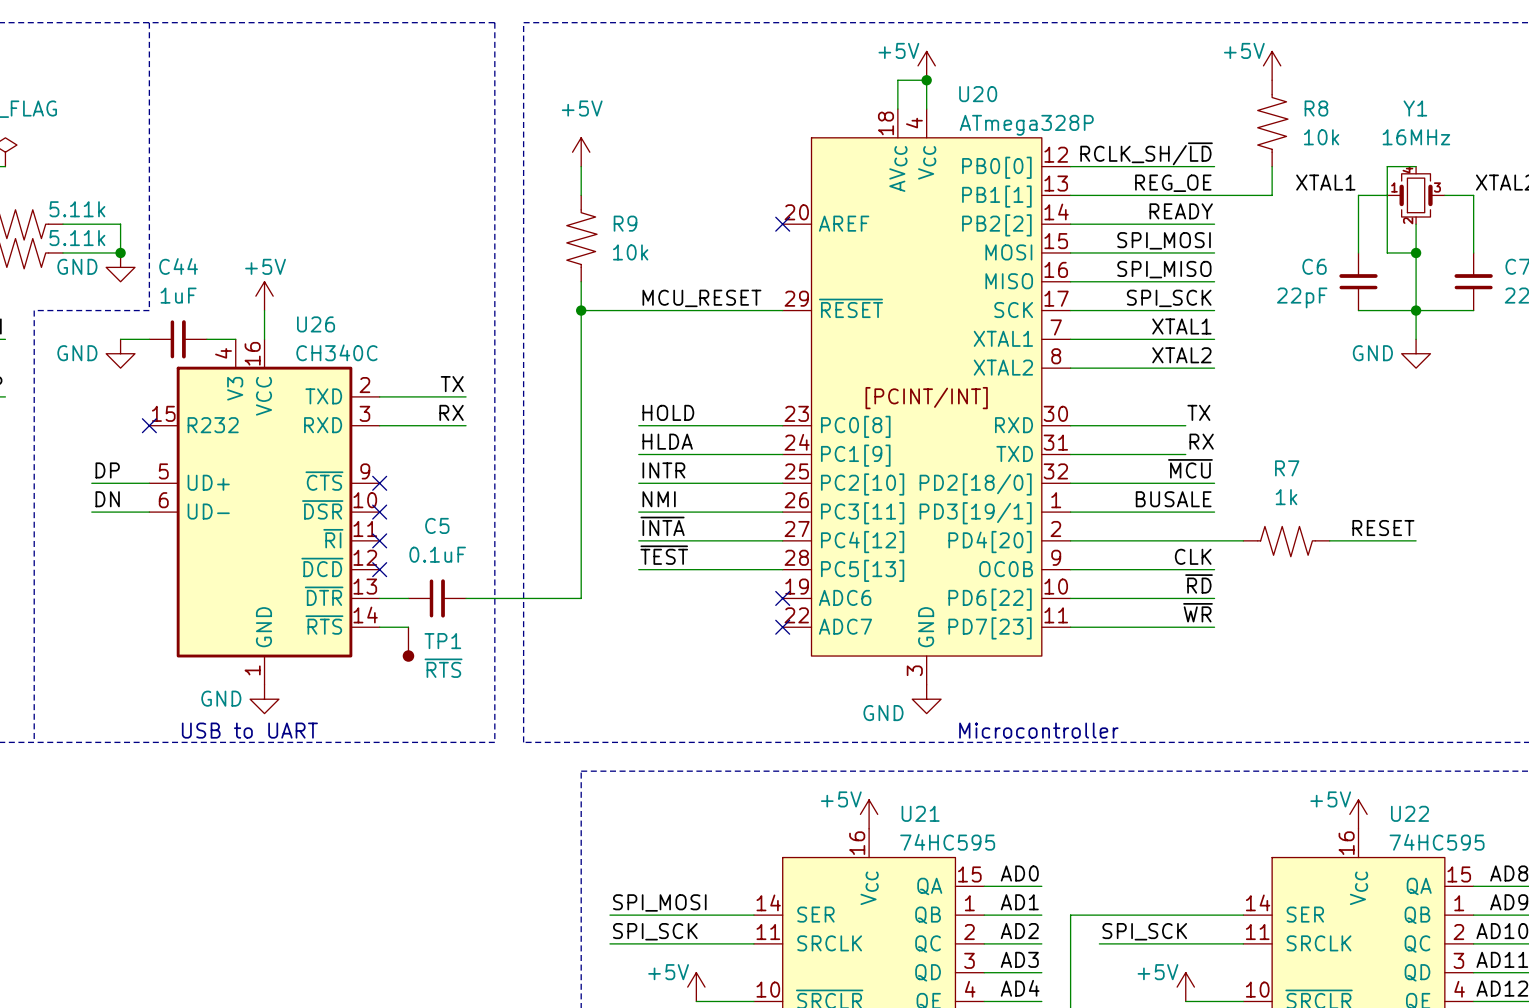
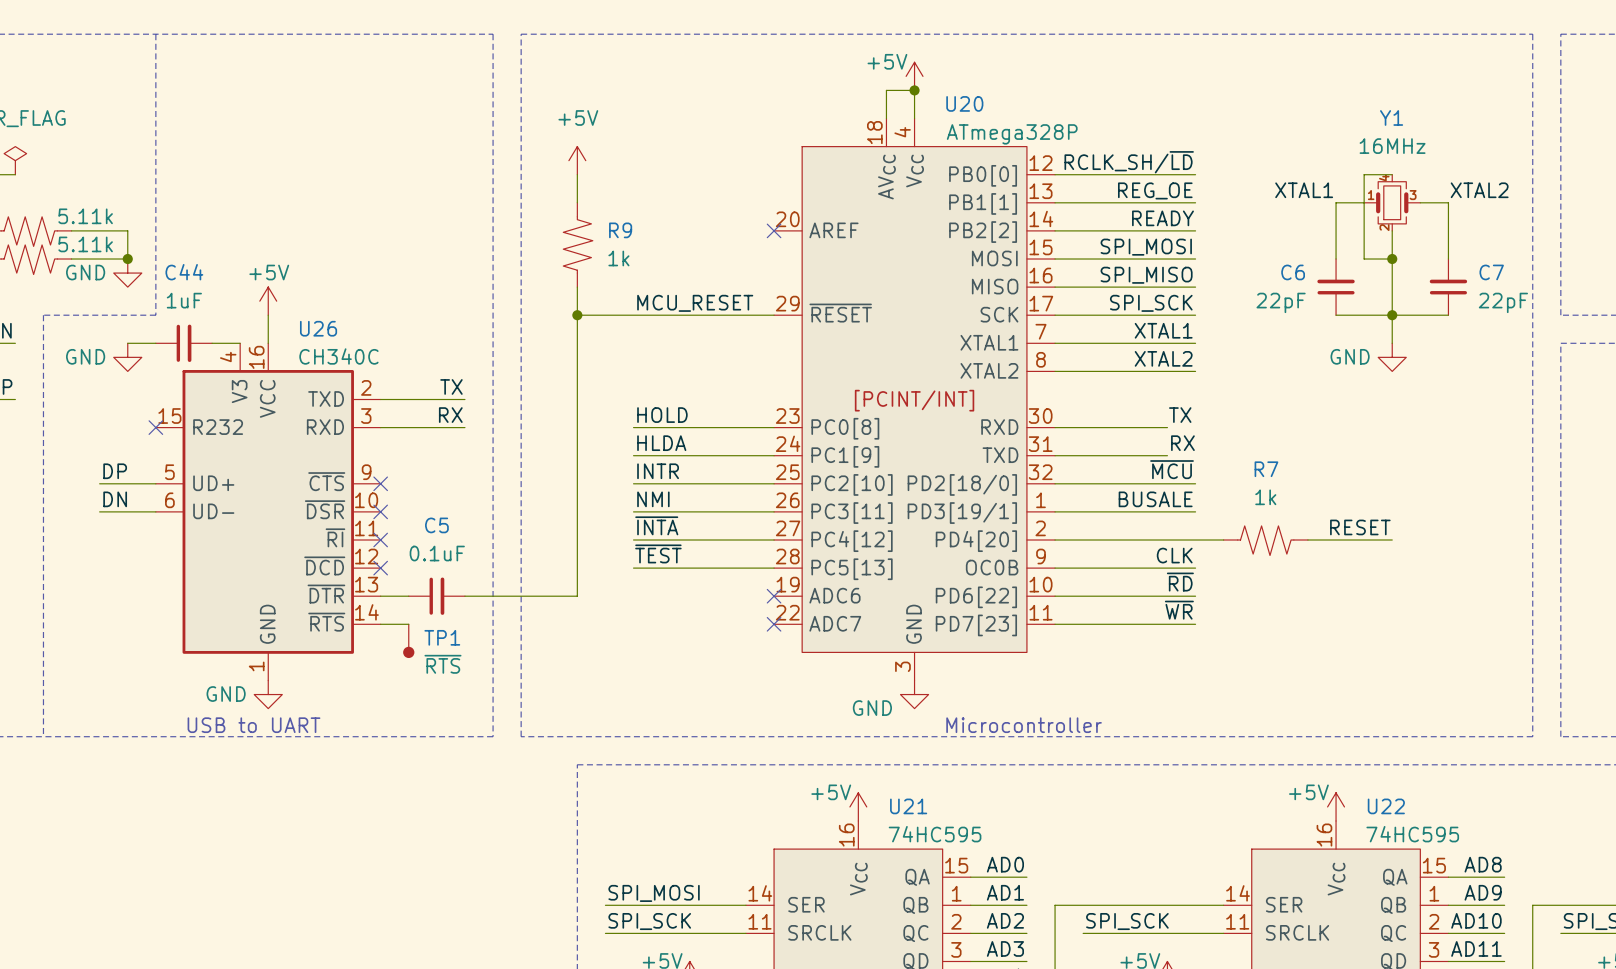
power symbol: +5V (1272, 65) -> none
R8: 10k (1272, 123) -> none
wire: (1272, 166) (1272, 195) (1214, 195) -> none
R9 value: 10k (630, 252) -> 1k (618, 258)

